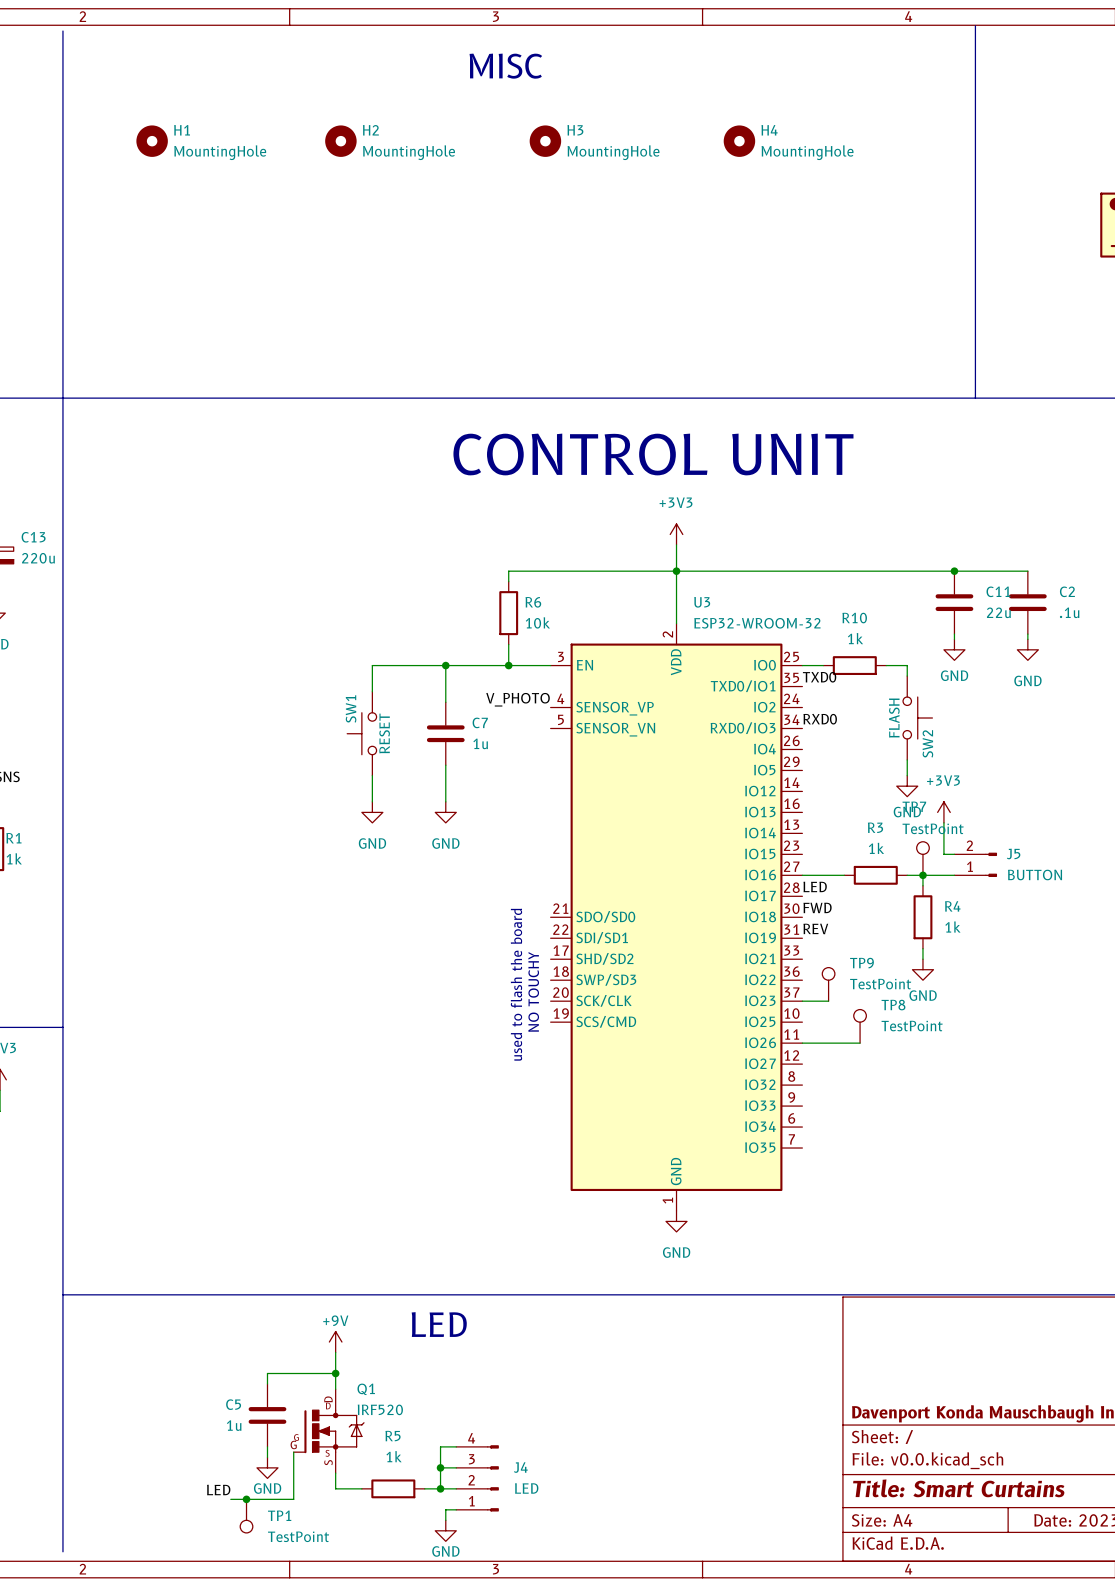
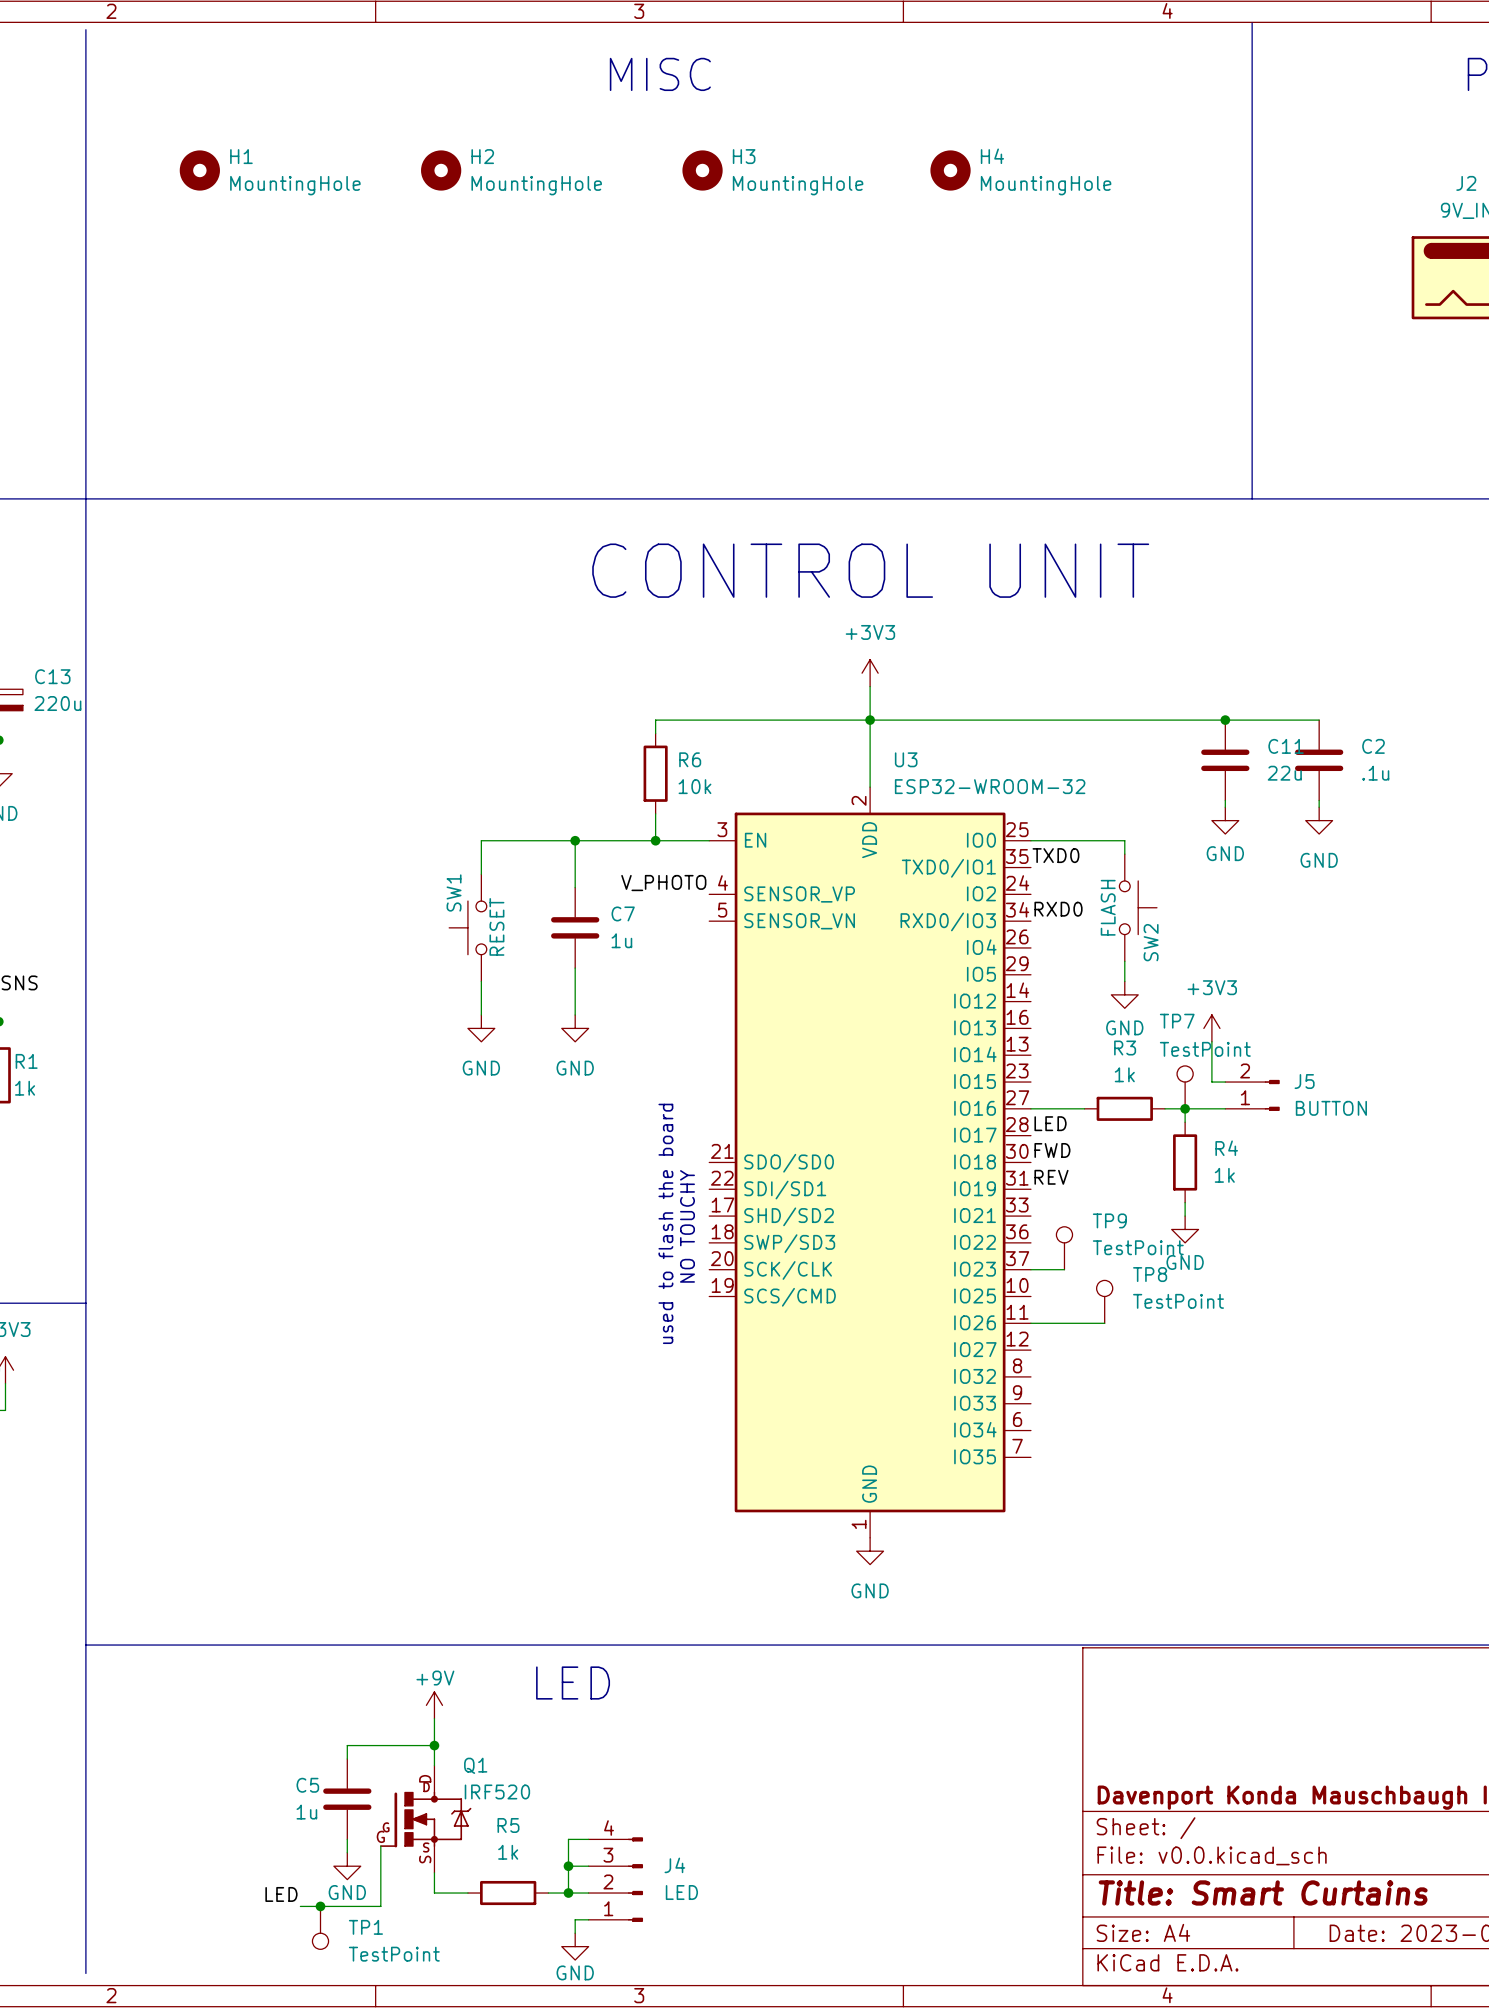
wire: none -> (1057, 840) (1124, 840) (1124, 854)
R10: 1k (854, 665) -> none
wire: (886, 665) (907, 665) (907, 676) -> none
SW2 position: (917, 718) -> (1138, 907)
wire: (907, 759) (907, 775) -> (1124, 961) (1124, 981)
power symbol position: GND (907, 786) -> GND (1124, 994)

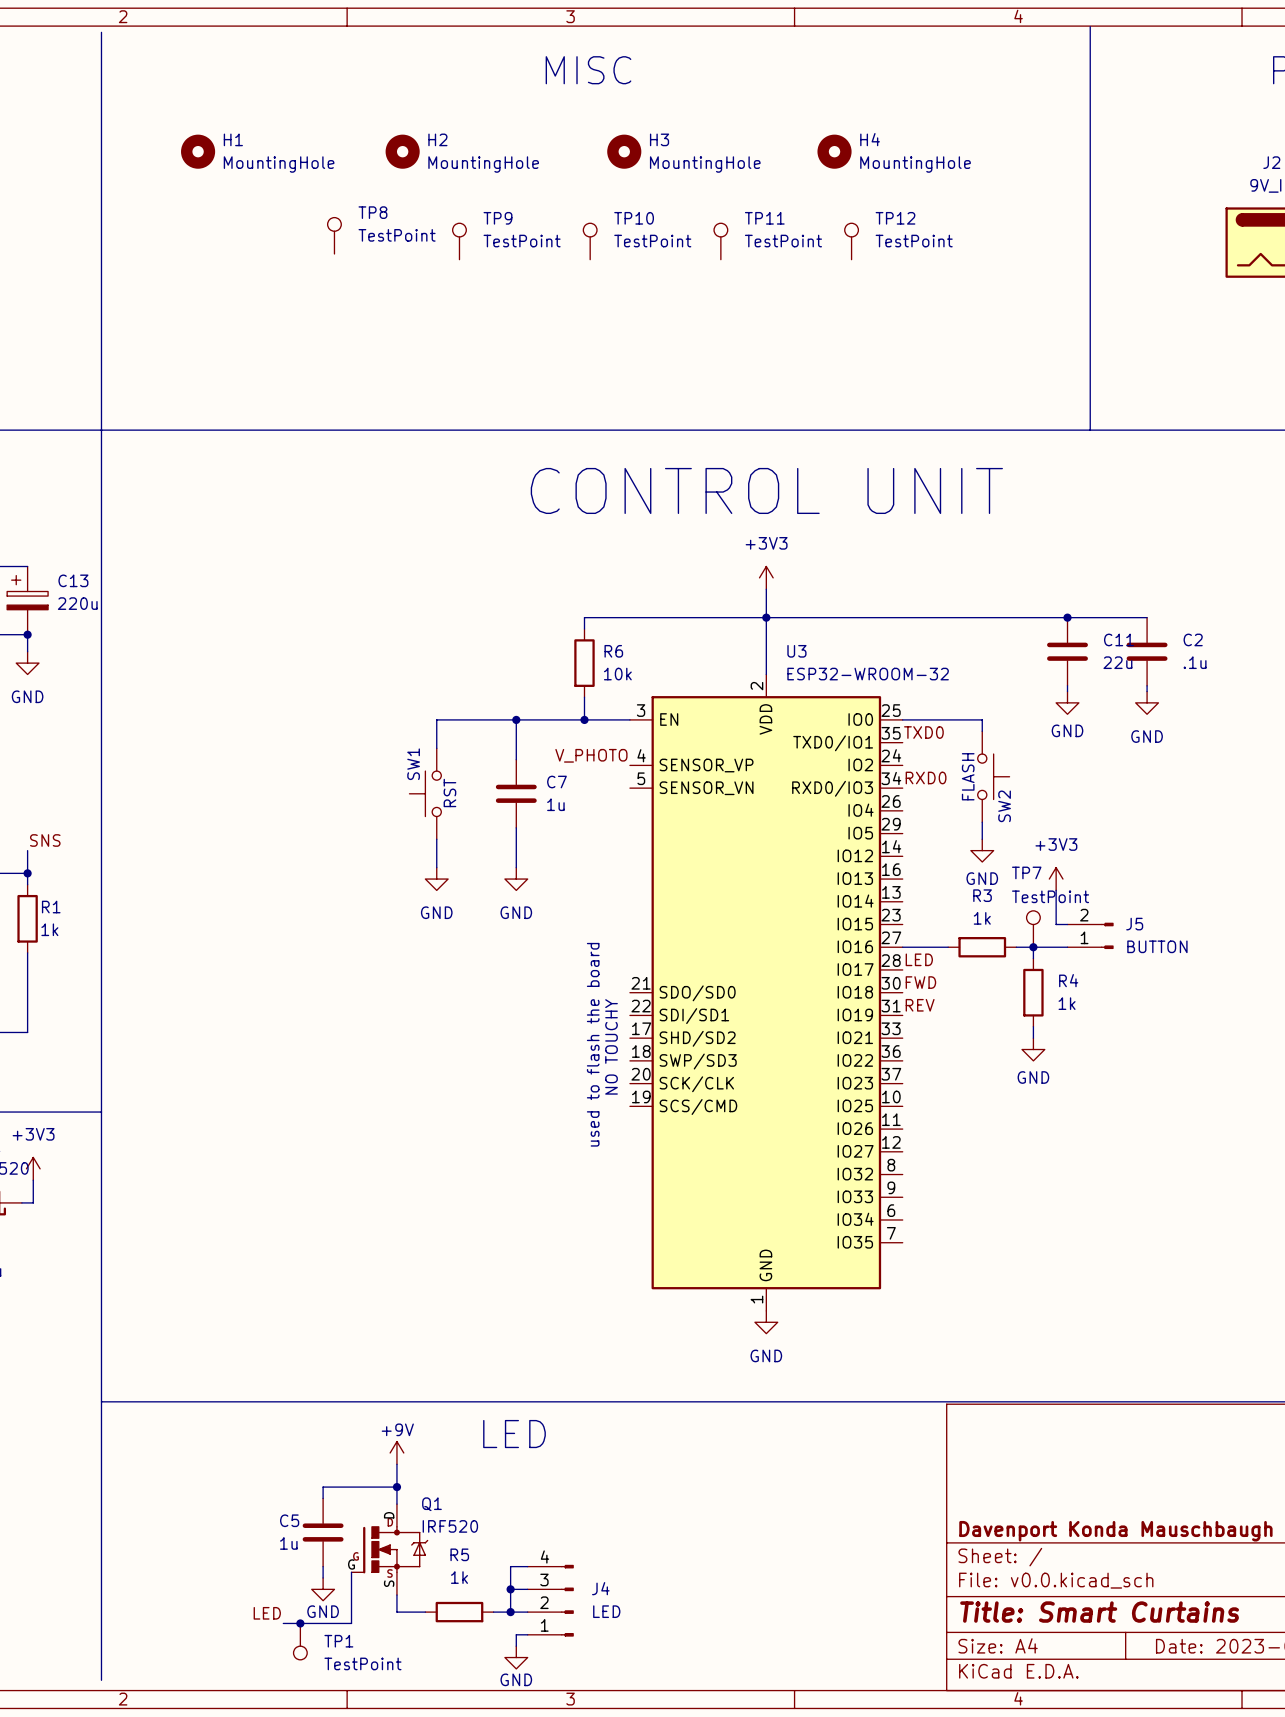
TP10: none -> TestPoint (590, 241)
TP11: none -> TestPoint (720, 241)
TP12: none -> TestPoint (851, 241)
SW1 value: RESET (496, 926) -> RST (449, 792)
TP9 position: (1064, 1248) -> (459, 241)
wire: (1030, 1269) (1064, 1269) -> none
TP8 position: (1104, 1301) -> (334, 235)
wire: (1030, 1323) (1104, 1323) -> none

